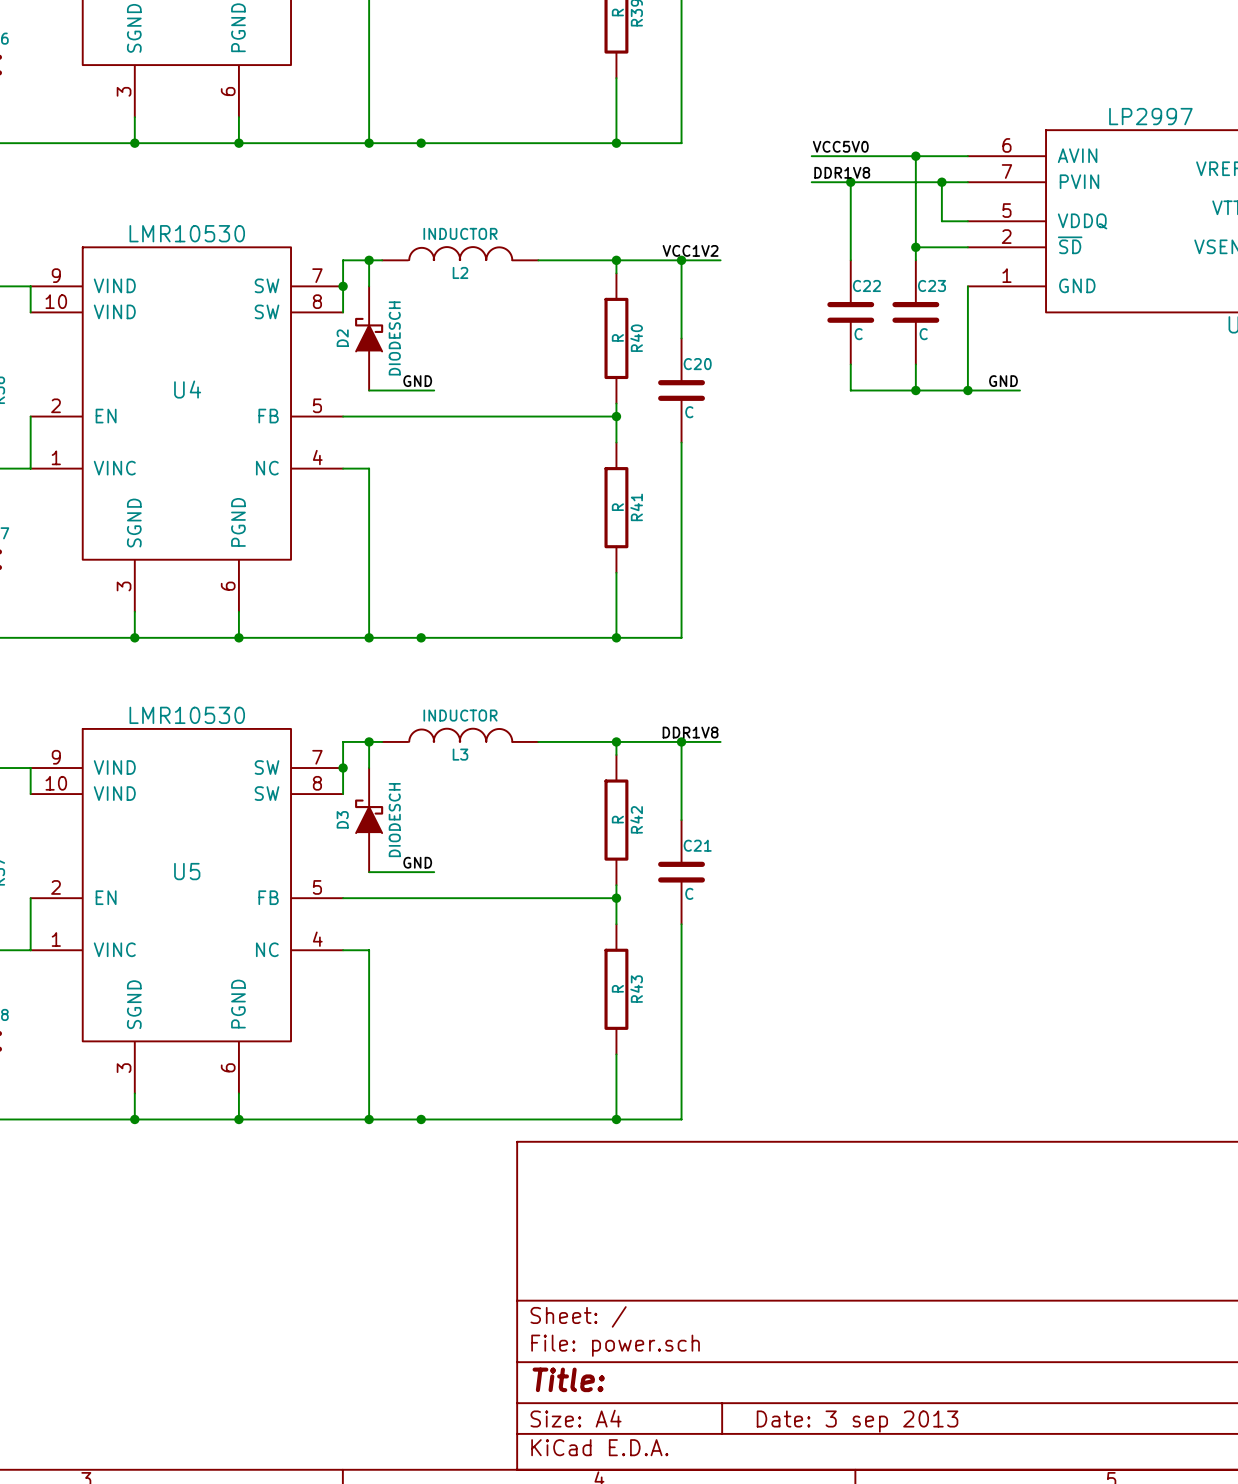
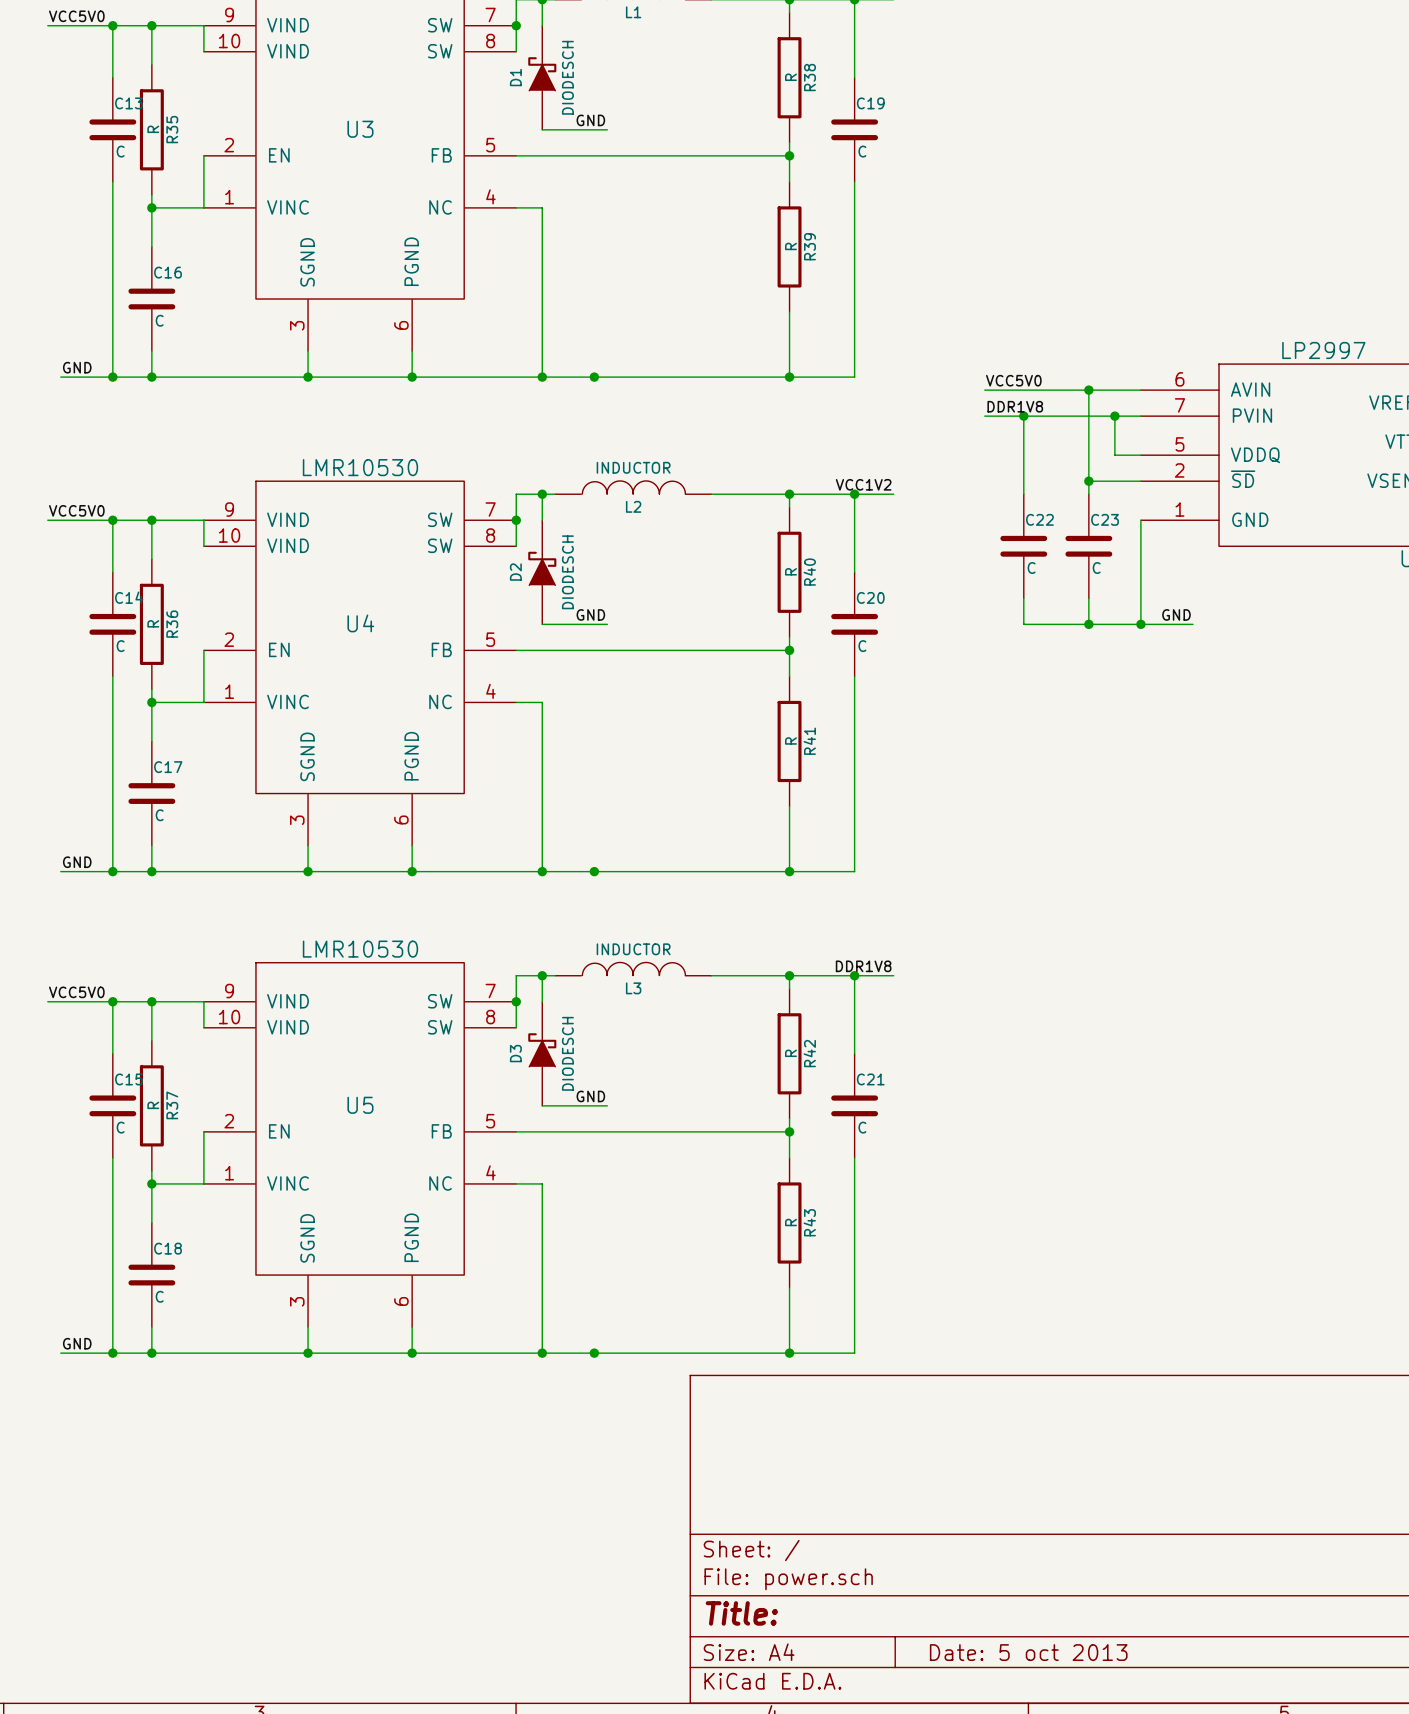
title block: Date: 3 sep 2013 (857, 1421) -> Date: 5 oct 2013 (1028, 1652)

